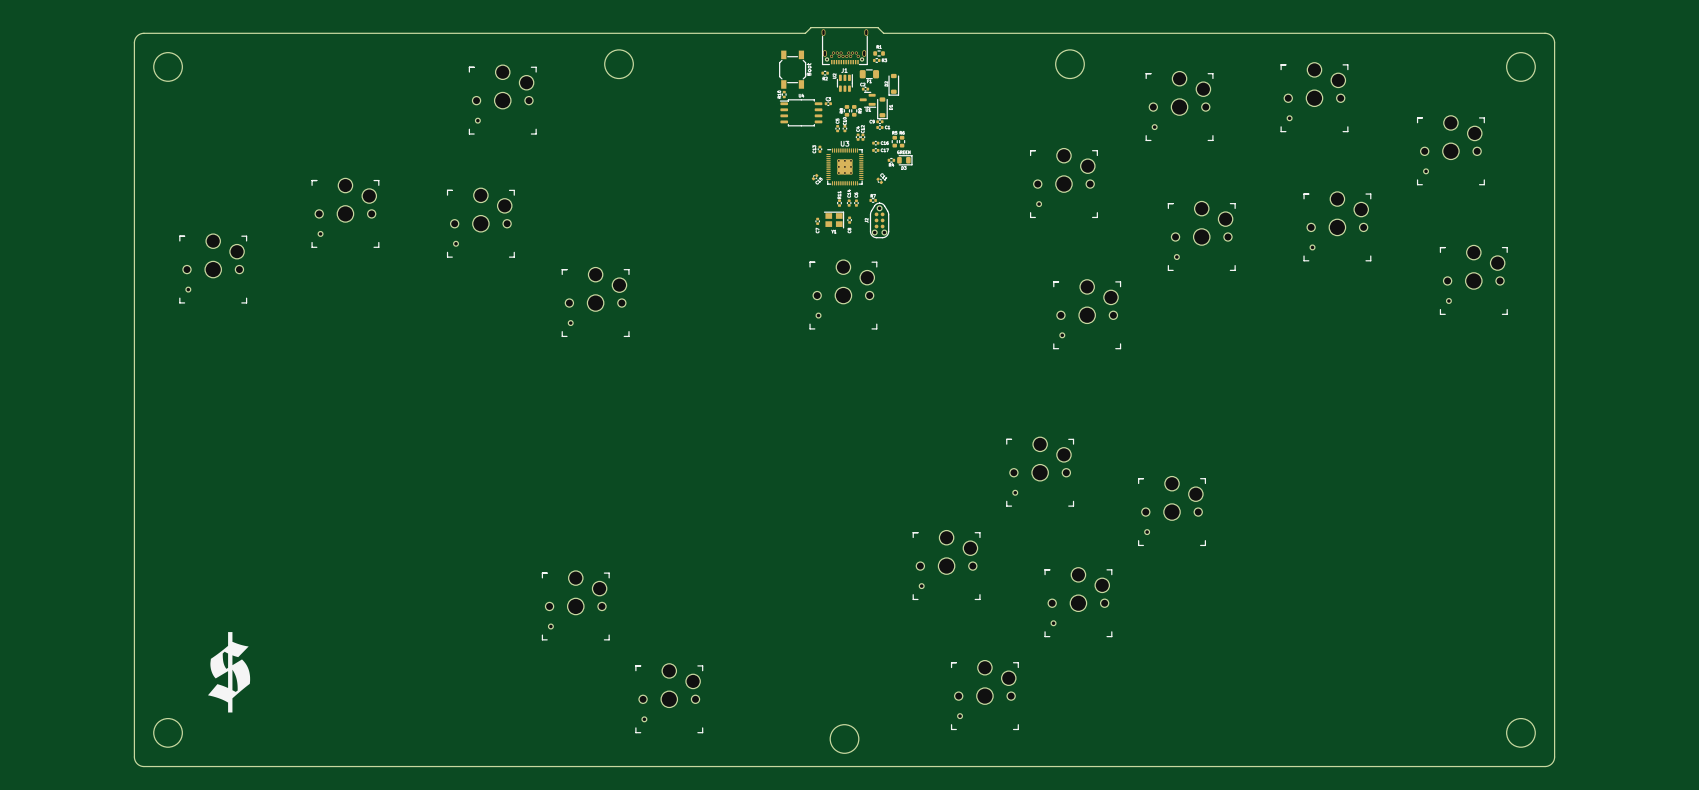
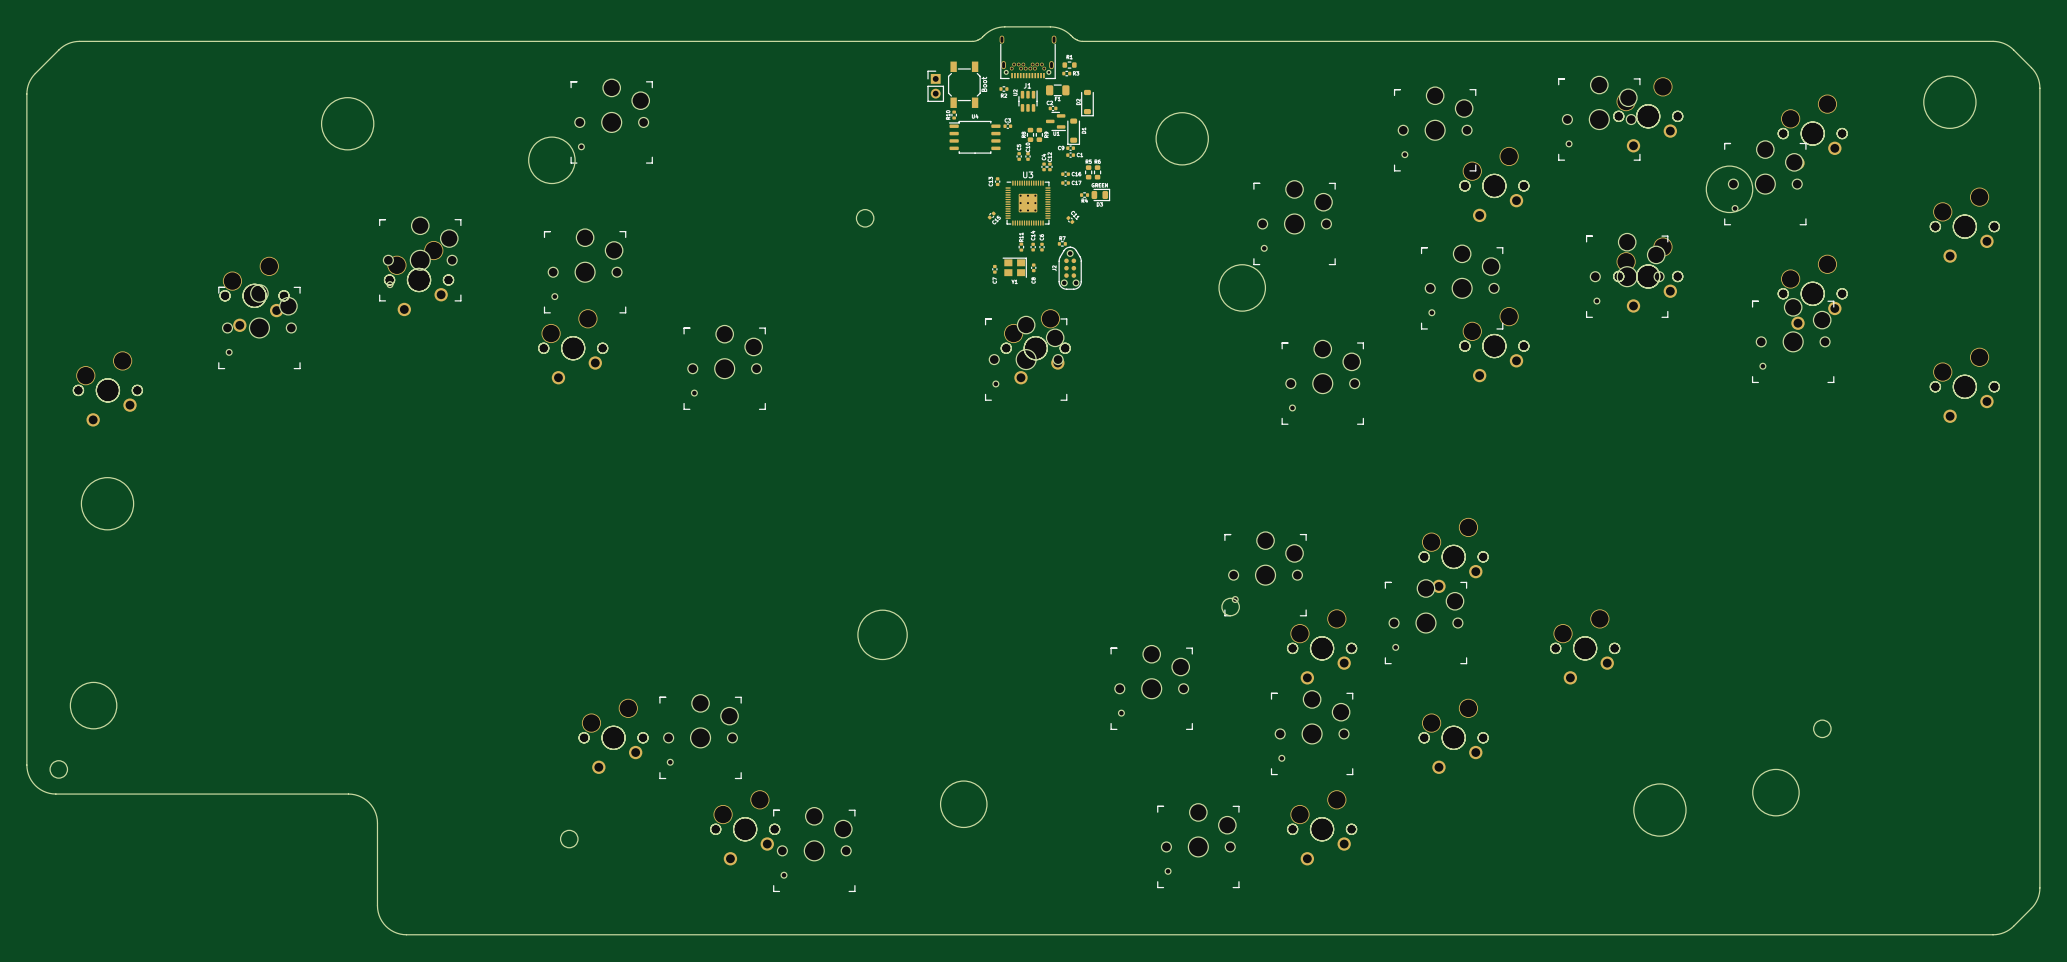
board edge: (811, 27) (877, 27) (883, 33) (1545, 33) (1551, 36) (1554, 42) (1554, 757) (1551, 763) (1545, 766) (143, 766) (137, 763) (134, 757) (134, 42) (137, 36) (143, 33) (805, 33) (811, 27) -> (1004, 26) (993, 29) (980, 38) (972, 41) (79, 41) (71, 42) (61, 47) (33, 75) (28, 85) (26, 94) (26, 765) (28, 774) (33, 783) (43, 791) (55, 794) (348, 794) (358, 795) (368, 802) (376, 816) (379, 915) (388, 928) (403, 934) (1993, 934) (2009, 929) (2033, 906) (2037, 899) (2039, 887) (2039, 88) (2035, 72) (2011, 47) (2004, 43) (1993, 41) (1082, 41) (1056, 27) (1004, 26)
round board edge: [604, 49, 634, 79] -> none
round board edge: [1055, 49, 1085, 79] -> none
round board edge: [153, 52, 183, 82] -> none
round board edge: [1506, 52, 1536, 82] -> none
round board edge: none -> [1923, 75, 1977, 129]
part: none -> (935, 86)
round board edge: none -> [321, 97, 375, 151]
part: none -> (1648, 102)
round board edge: none -> [1155, 112, 1209, 166]
part: none -> (1812, 119)
part: none -> (1648, 128)
round board edge: none -> [528, 136, 576, 185]
part: none -> (1812, 145)
round board edge: none -> [1705, 165, 1754, 214]
part: none -> (1494, 172)
part: none -> (1494, 198)
round board edge: none -> [855, 209, 875, 228]
part: none -> (1964, 212)
part: none -> (1964, 238)
part: none -> (1648, 262)
round board edge: none -> [1218, 264, 1267, 312]
part: none -> (419, 266)
part: none -> (1812, 280)
part: none -> (254, 282)
part: none -> (1648, 288)
part: none -> (419, 292)
part: none -> (1812, 306)
part: none -> (254, 308)
part: none -> (1494, 332)
part: none -> (573, 334)
part: none -> (1035, 334)
part: none -> (1494, 358)
part: none -> (573, 360)
part: none -> (1035, 360)
part: none -> (1964, 373)
part: none -> (107, 376)
part: none -> (1964, 399)
part: none -> (107, 402)
round board edge: none -> [80, 477, 135, 531]
part: none -> (1453, 543)
part: none -> (1453, 569)
round board edge: none -> [1221, 597, 1240, 617]
round board edge: none -> [857, 609, 908, 661]
part: none -> (1322, 634)
part: none -> (1585, 634)
part: none -> (1322, 660)
part: none -> (1585, 660)
round board edge: none -> [69, 681, 118, 730]
round board edge: none -> [1813, 719, 1832, 739]
part: none -> (613, 724)
part: none -> (1453, 724)
part: none -> (613, 750)
part: none -> (1453, 750)
round board edge: none -> [49, 760, 69, 779]
round board edge: none -> [1752, 768, 1800, 817]
drawing: [207, 632, 251, 713] -> none
round board edge: none -> [939, 780, 988, 829]
round board edge: none -> [1633, 783, 1687, 837]
part: none -> (745, 815)
part: none -> (1322, 815)
round board edge: none -> [560, 829, 579, 849]
part: none -> (745, 841)
part: none -> (1322, 841)
round board edge: [153, 718, 183, 748] -> none
round board edge: [1506, 718, 1536, 748] -> none
round board edge: [829, 724, 860, 754] -> none

